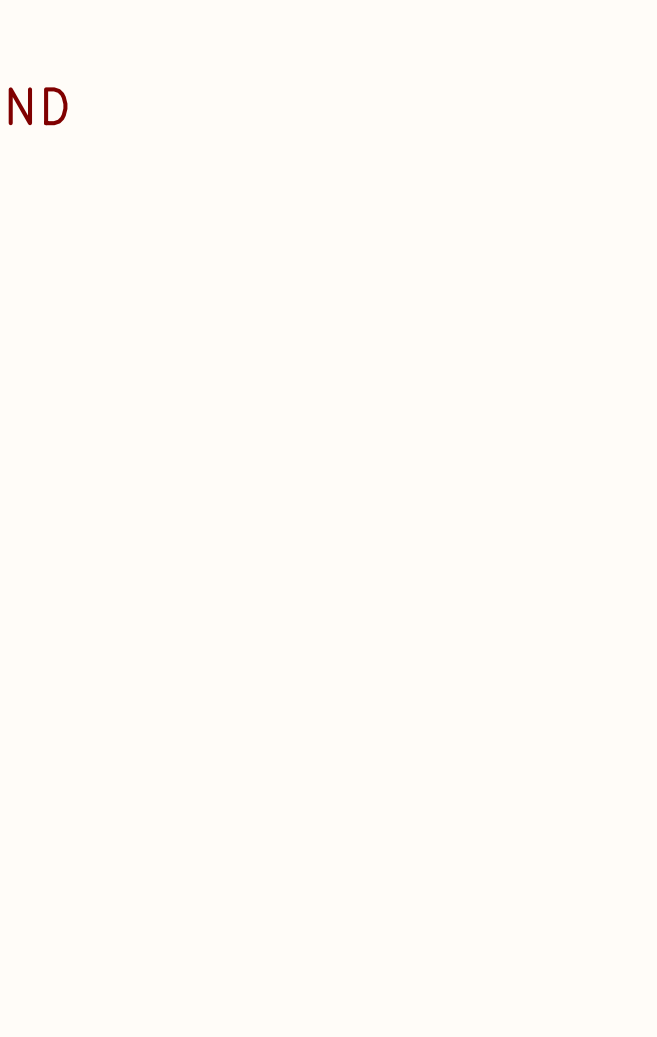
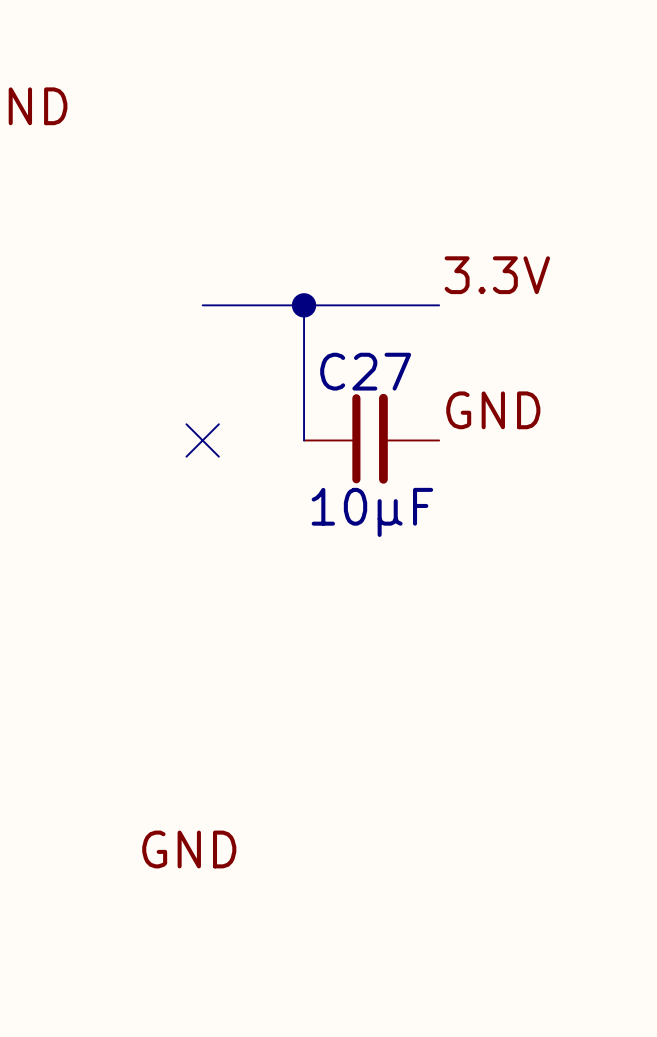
label: none -> 3.3V (497, 275)
wire: none -> (202, 305) (439, 305)
wire: none -> (304, 305) (304, 440)
junction: none -> (304, 305)
label: none -> GND (493, 410)
C27: none -> 10μF (371, 438)
no-connect mark: none -> (202, 440)
label: none -> GND (189, 849)

